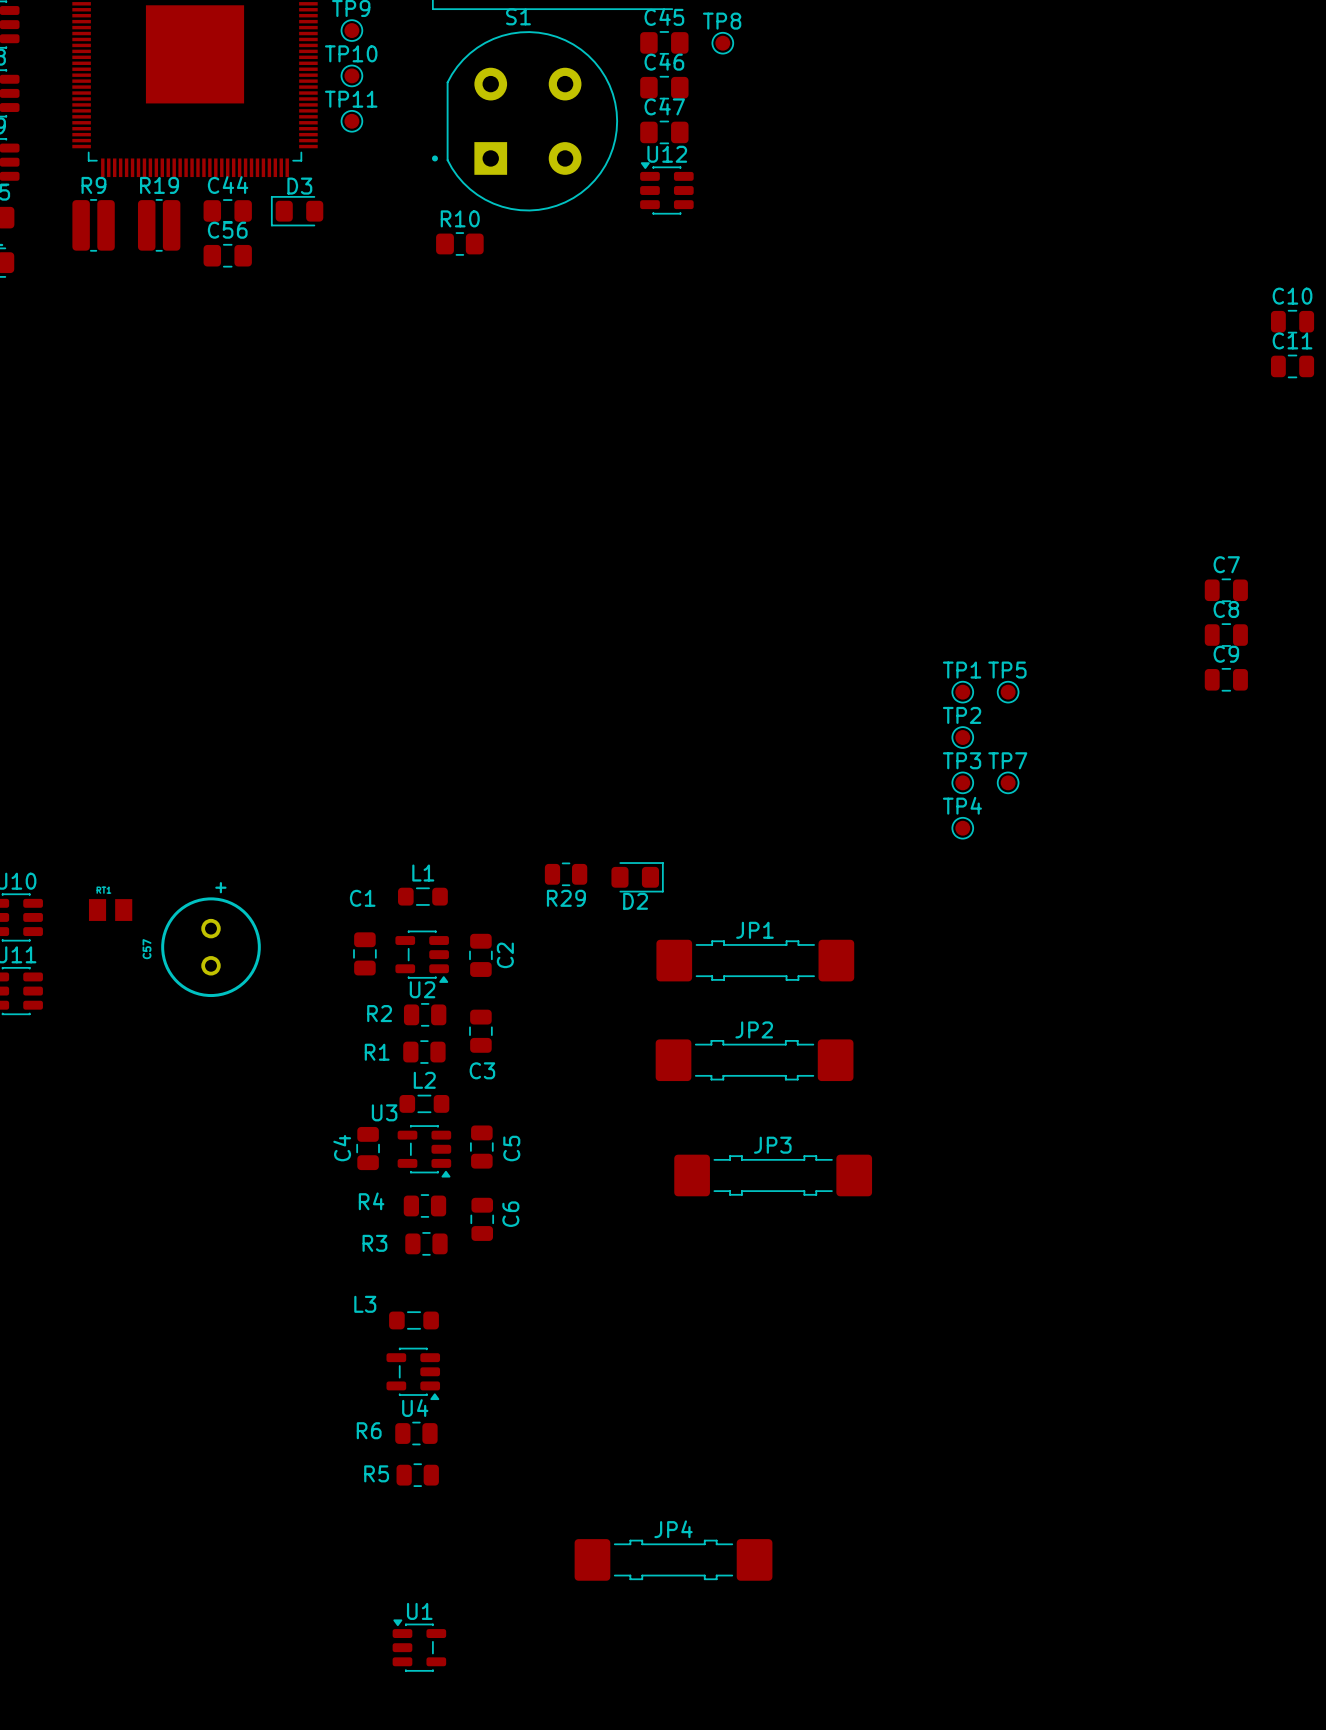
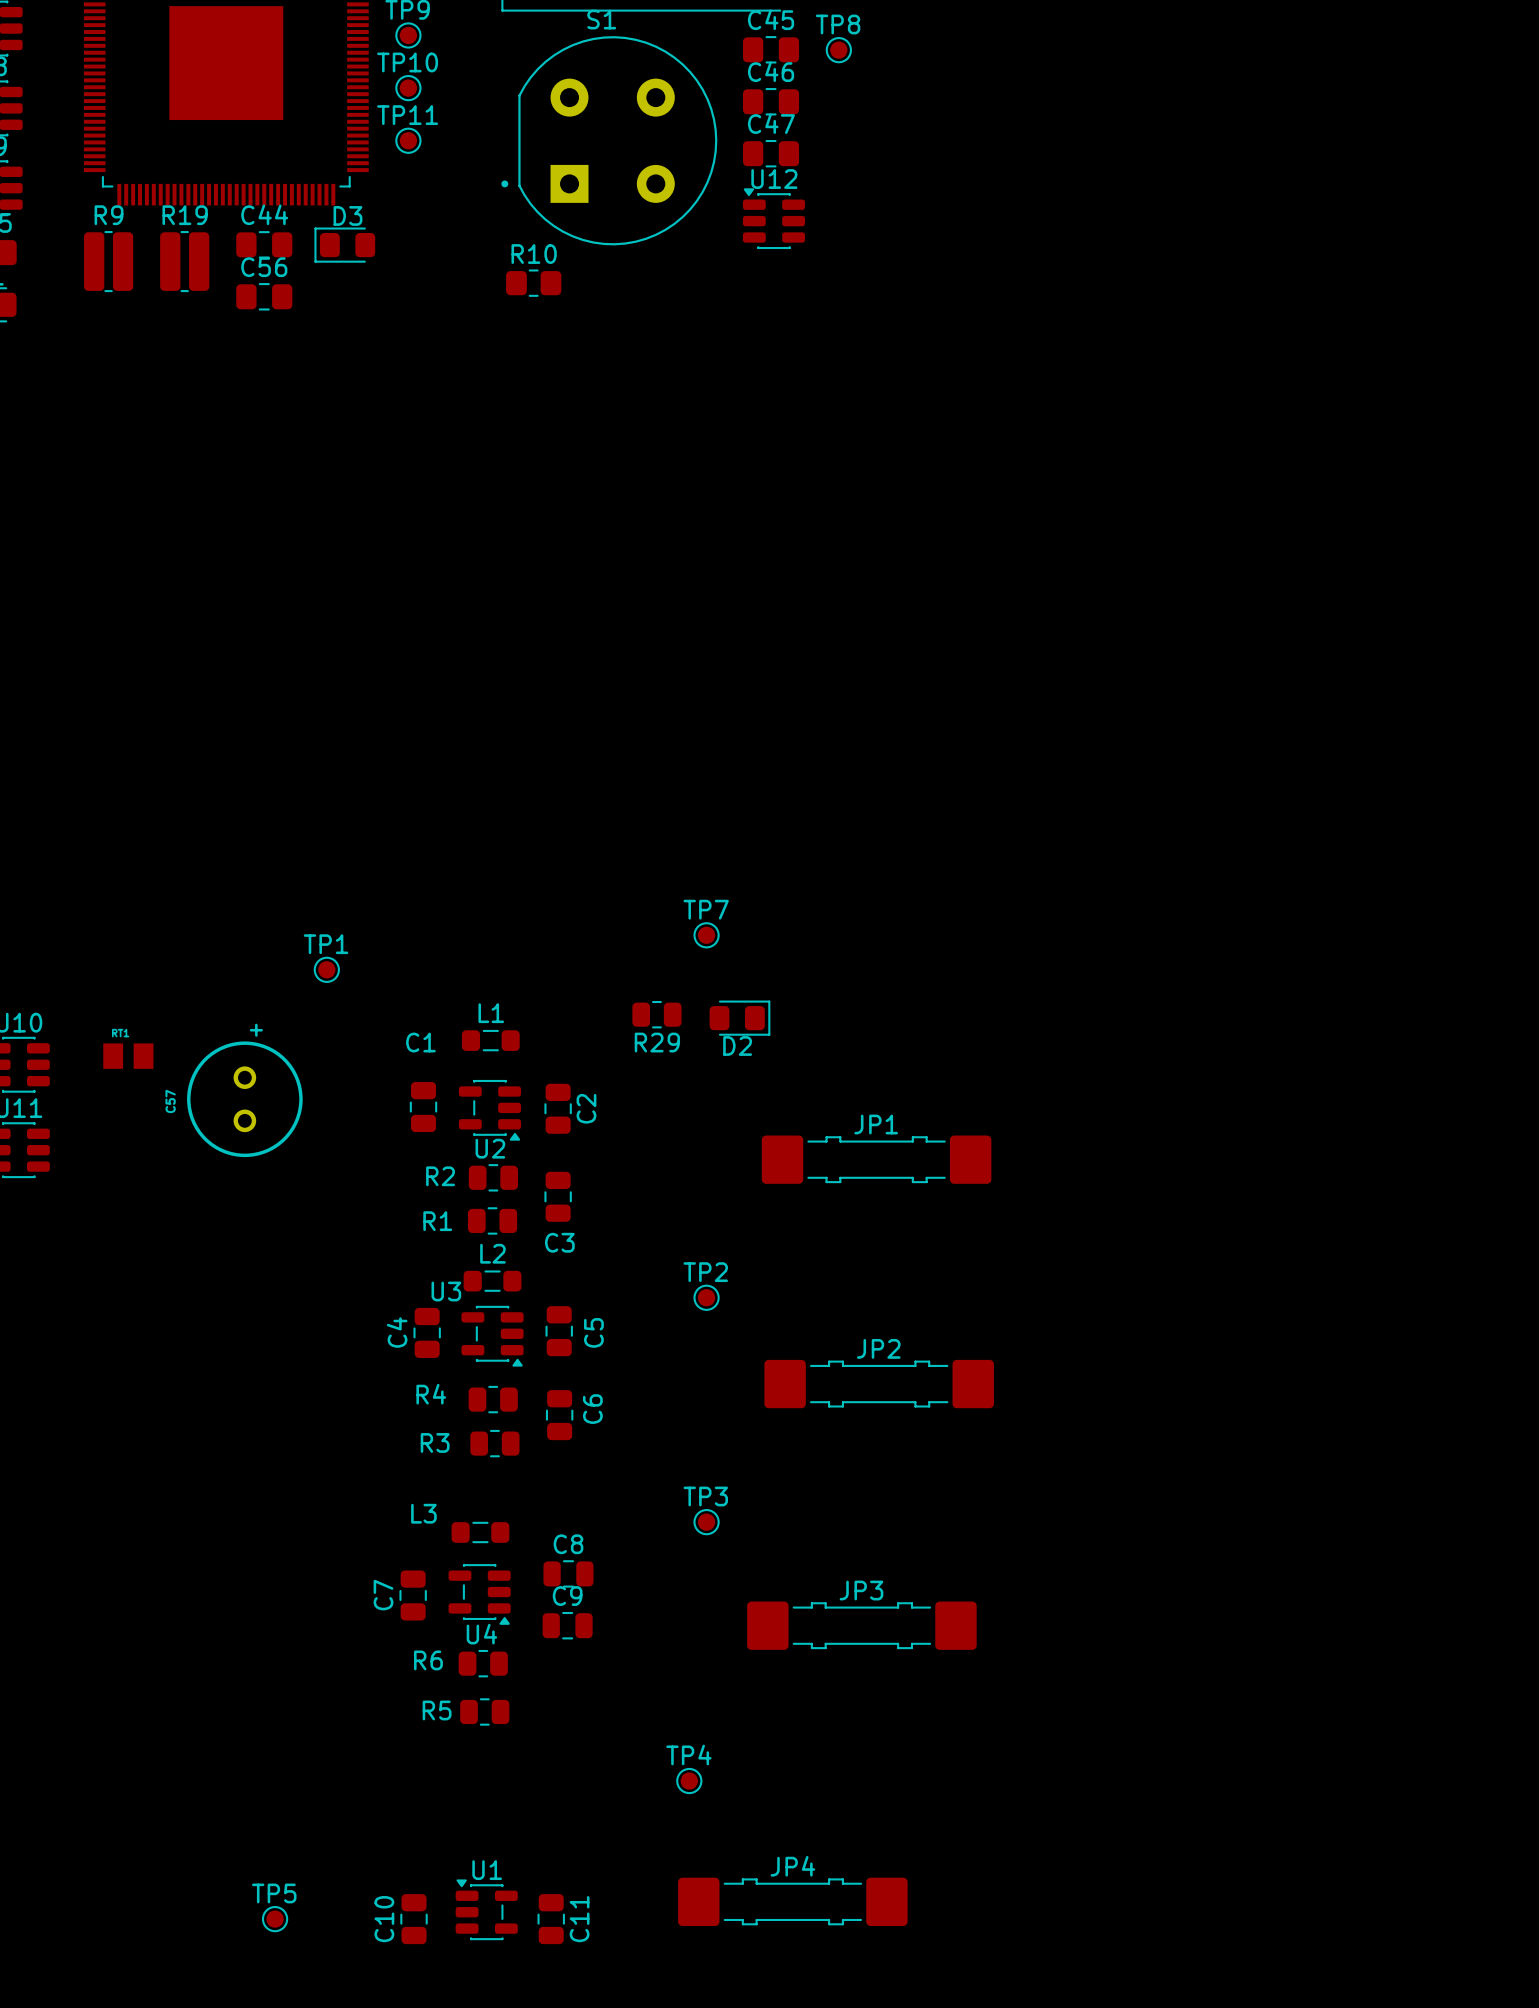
C10 name position: C10 (1292, 296) -> C10 (384, 1919)
C10 rotation: 0° (1292, 321) -> 90° clockwise (414, 1919)
C10 position: (1292, 321) -> (414, 1919)
C11 rotation: 0° (1292, 366) -> 90° clockwise (551, 1919)
C11 position: (1292, 366) -> (551, 1919)
C7 name position: C7 (1226, 564) -> C7 (383, 1595)
C7 rotation: 0° (1226, 590) -> 90° clockwise (413, 1595)
C7 position: (1226, 590) -> (413, 1595)
C8 position: (1226, 635) -> (568, 1573)
C9 position: (1226, 679) -> (567, 1625)
TP1 position: (962, 692) -> (326, 969)
TP5 position: (1008, 692) -> (275, 1919)
TP2 position: (962, 737) -> (706, 1297)
TP3 position: (962, 782) -> (706, 1522)
TP7 position: (1008, 782) -> (706, 935)
TP4 position: (962, 828) -> (689, 1781)
JP1 position: (755, 960) -> (876, 1159)
JP2 position: (754, 1060) -> (879, 1384)
JP3 position: (773, 1175) -> (861, 1625)
JP4 position: (673, 1559) -> (792, 1901)

